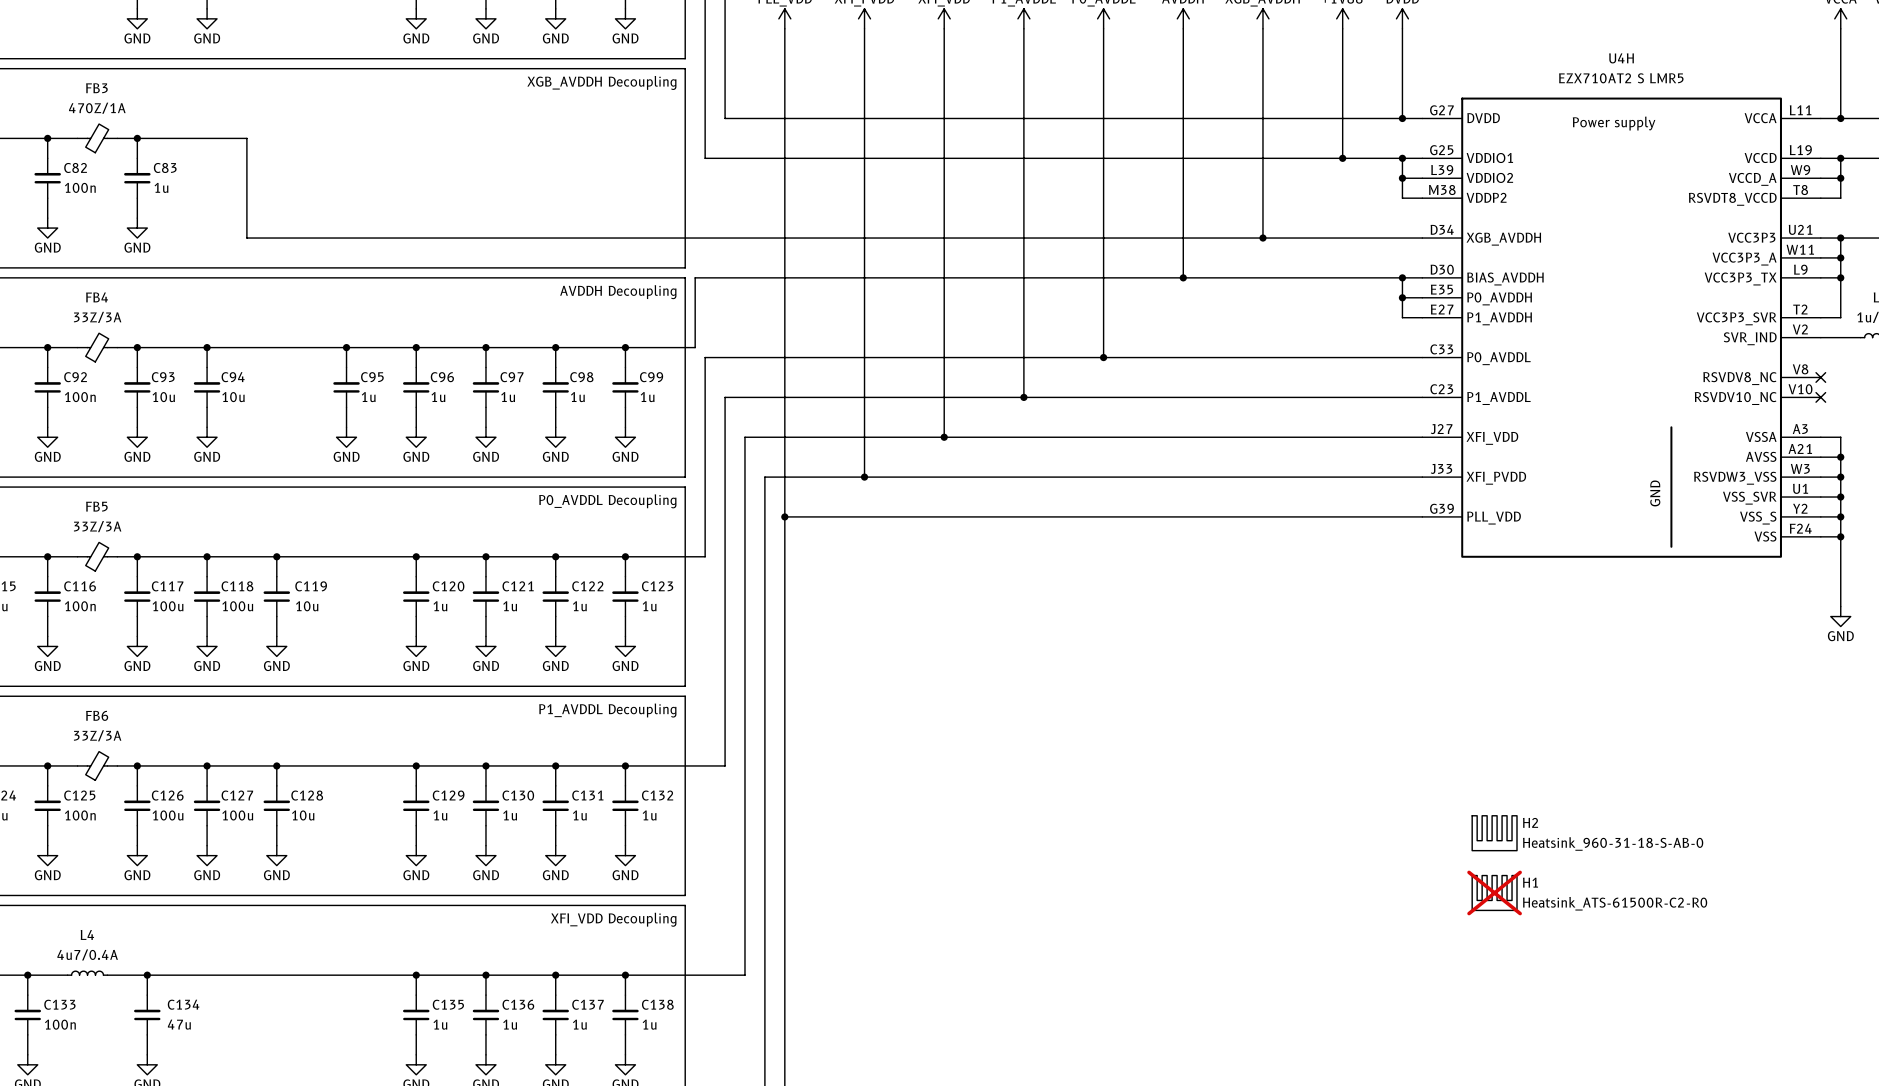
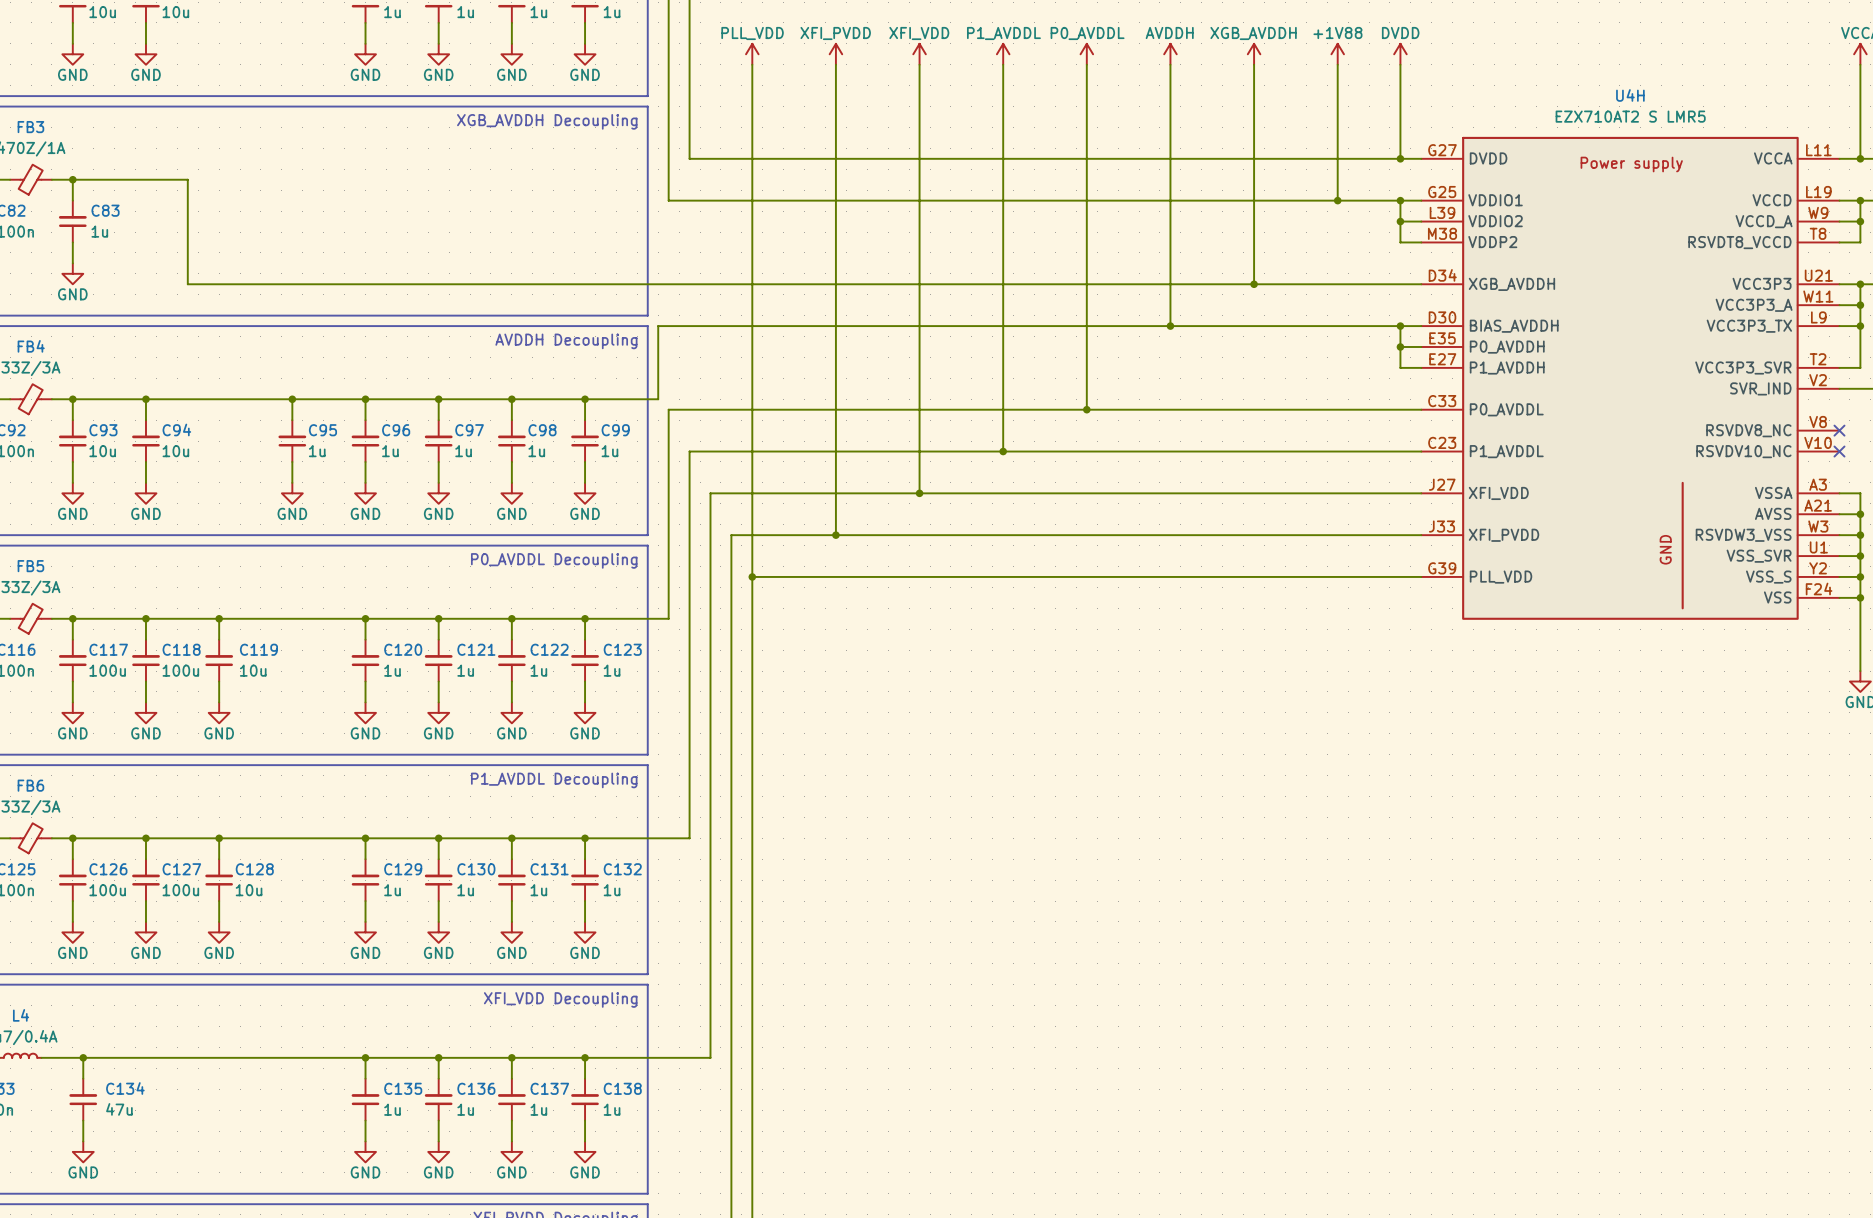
H2: Heatsink_960-31-18-S-AB-0 (1494, 833) -> none
H1: Heatsink_ATS-61500R-C2-R0 (1494, 892) -> none

